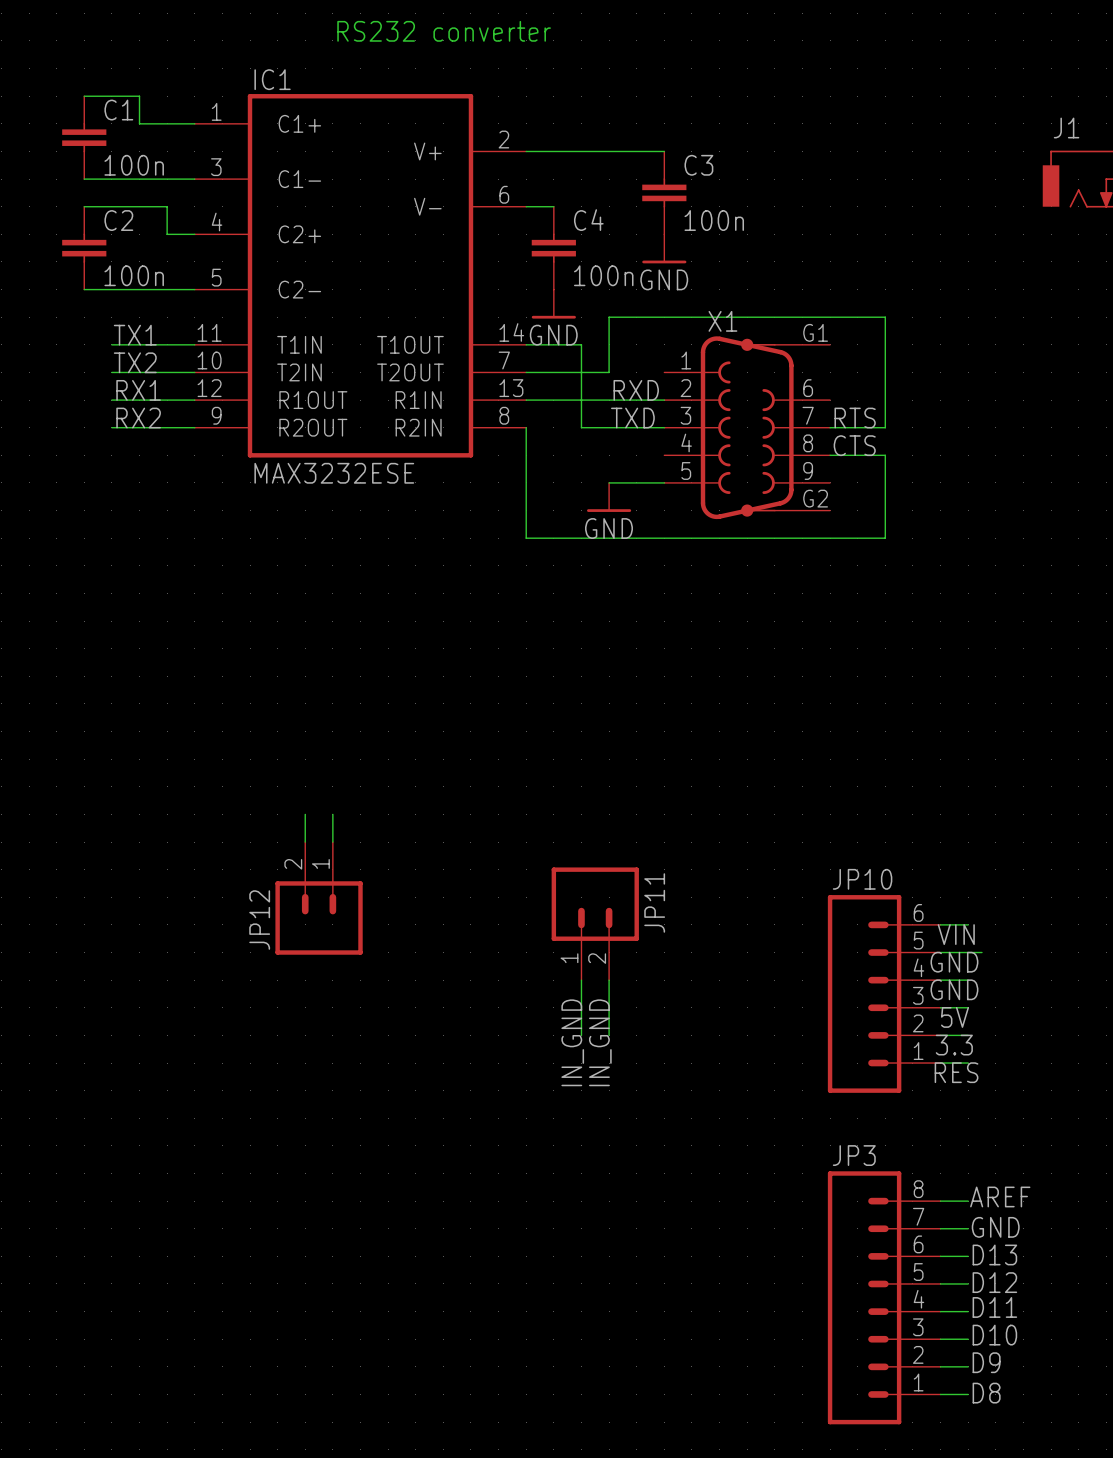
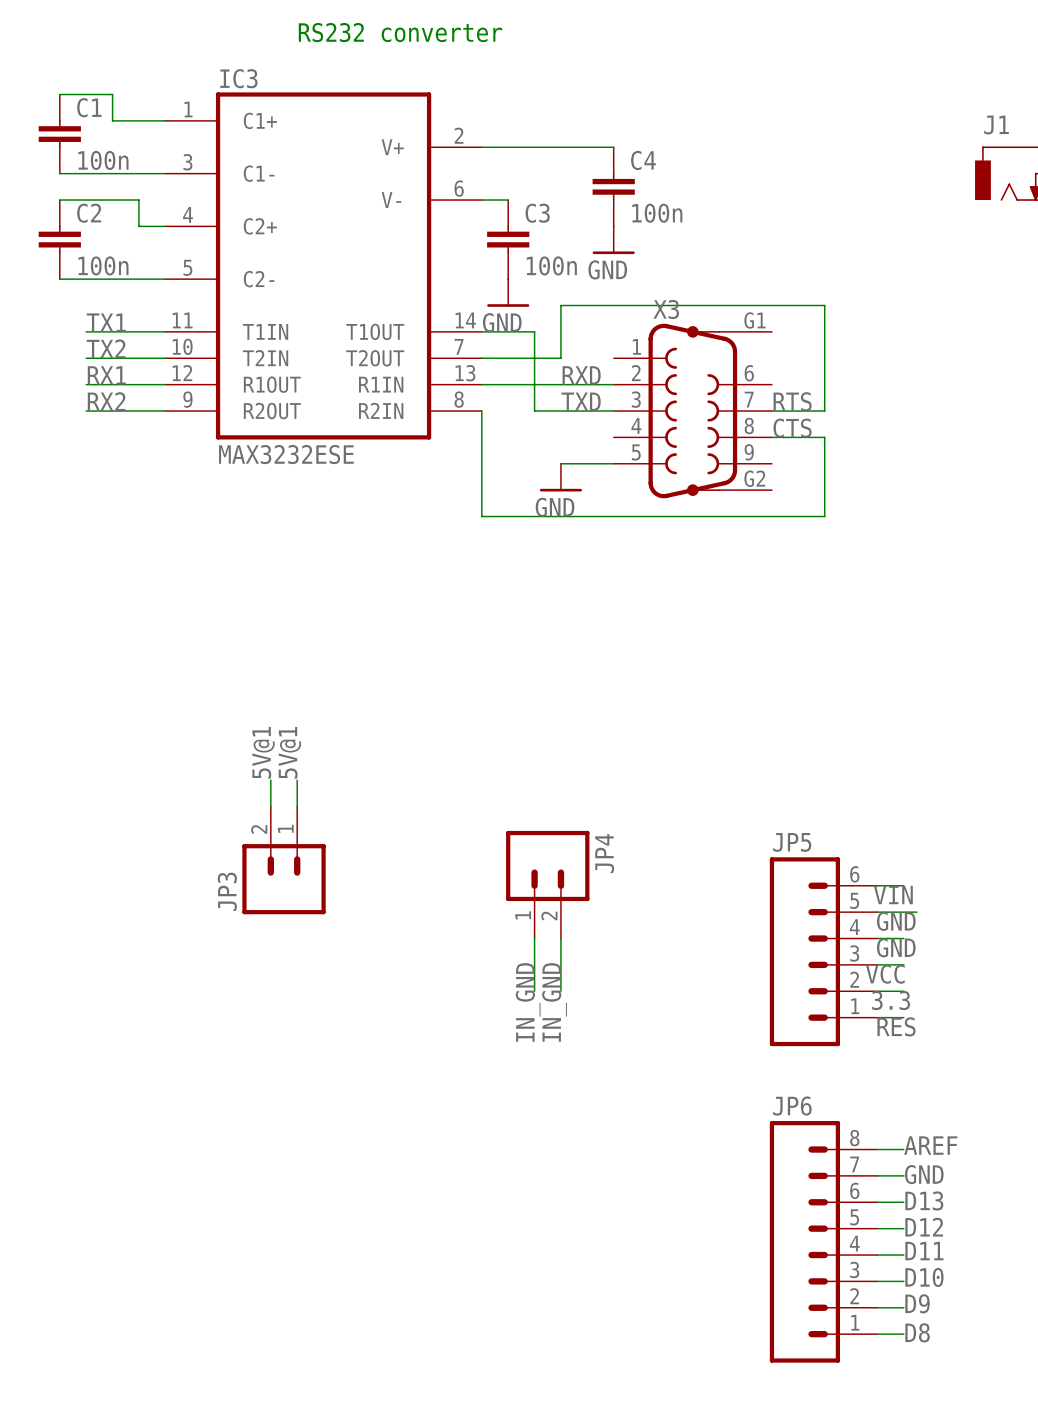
IC1 name: IC1 (272, 79) -> IC3 (238, 78)
C3 name: C3 (698, 165) -> C4 (643, 160)
C4 name: C4 (588, 220) -> C3 (537, 213)
X1 name: X1 (722, 321) -> X3 (666, 309)
label: none -> 5V@1 (263, 752)
label: none -> 5V@1 (289, 752)
JP10 name: JP10 (862, 879) -> JP5 (792, 842)
JP11 name: JP11 (654, 902) -> JP4 (604, 853)
JP12 name: JP12 (259, 920) -> JP3 (227, 891)
label: 5V (955, 1017) -> VCC (885, 974)
JP3 name: JP3 (854, 1155) -> JP6 (792, 1106)

